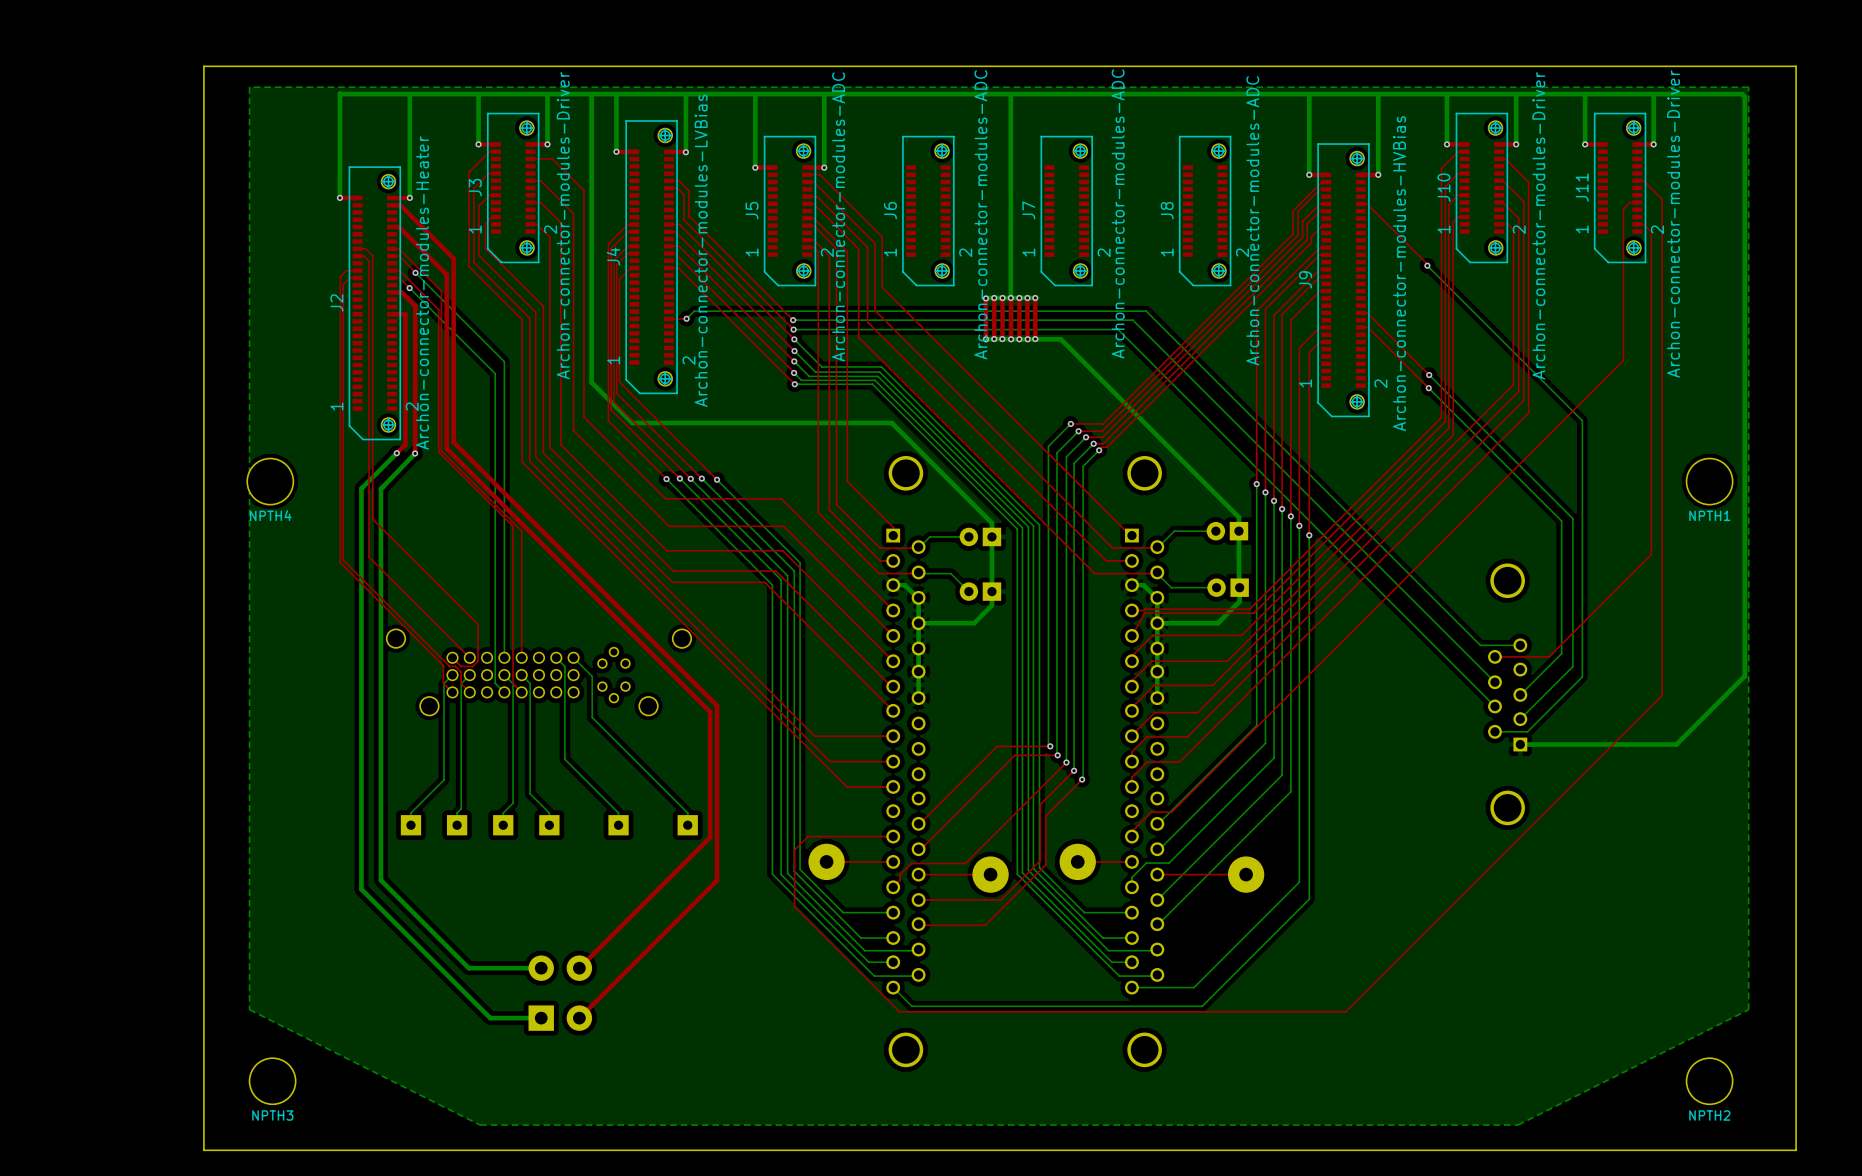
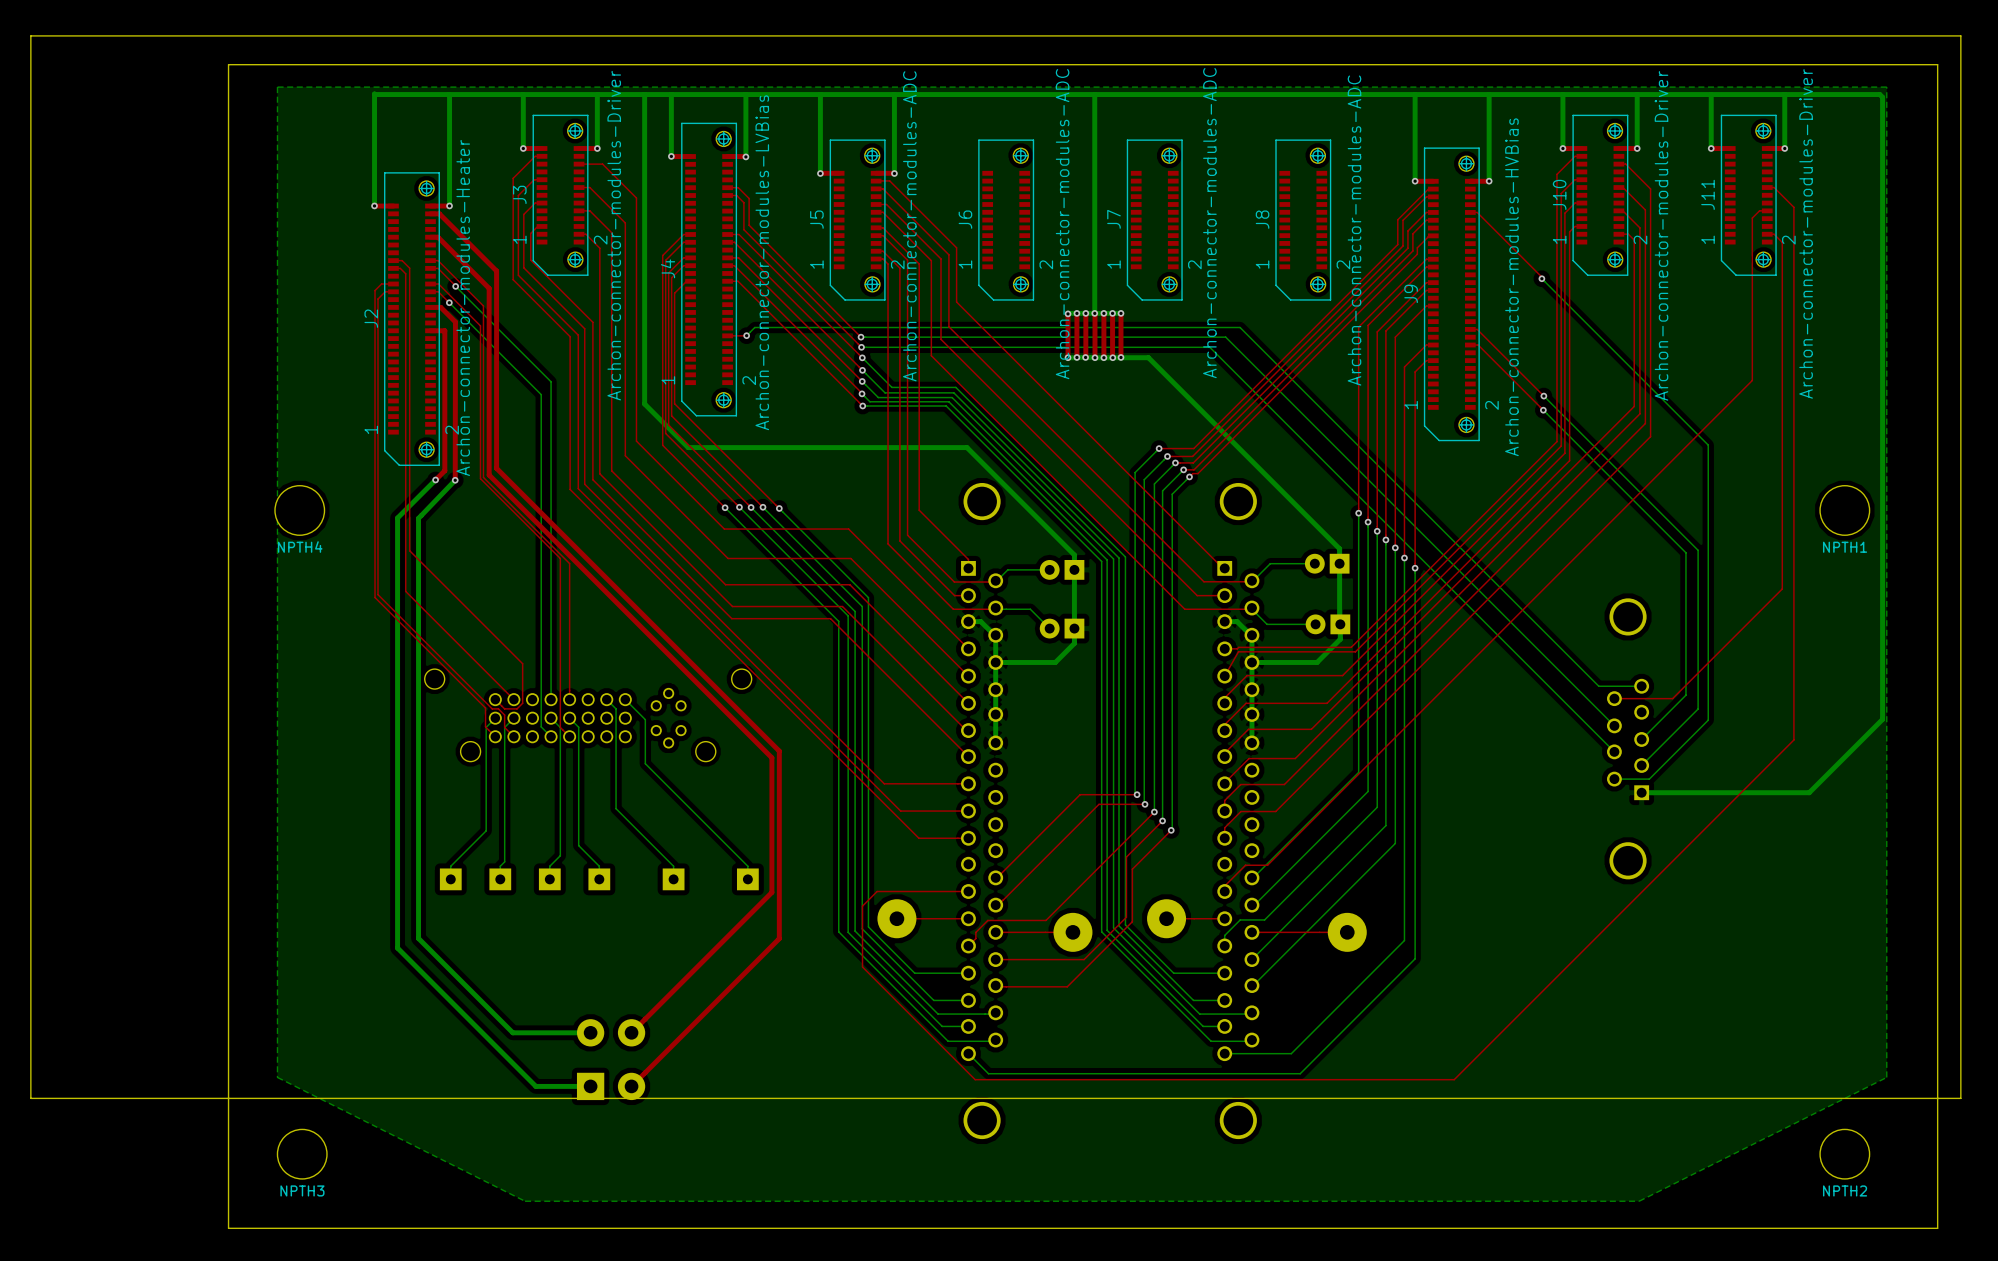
board edge: none -> (30, 35) (1960, 35) (1960, 1098) (30, 1098) (30, 35)

